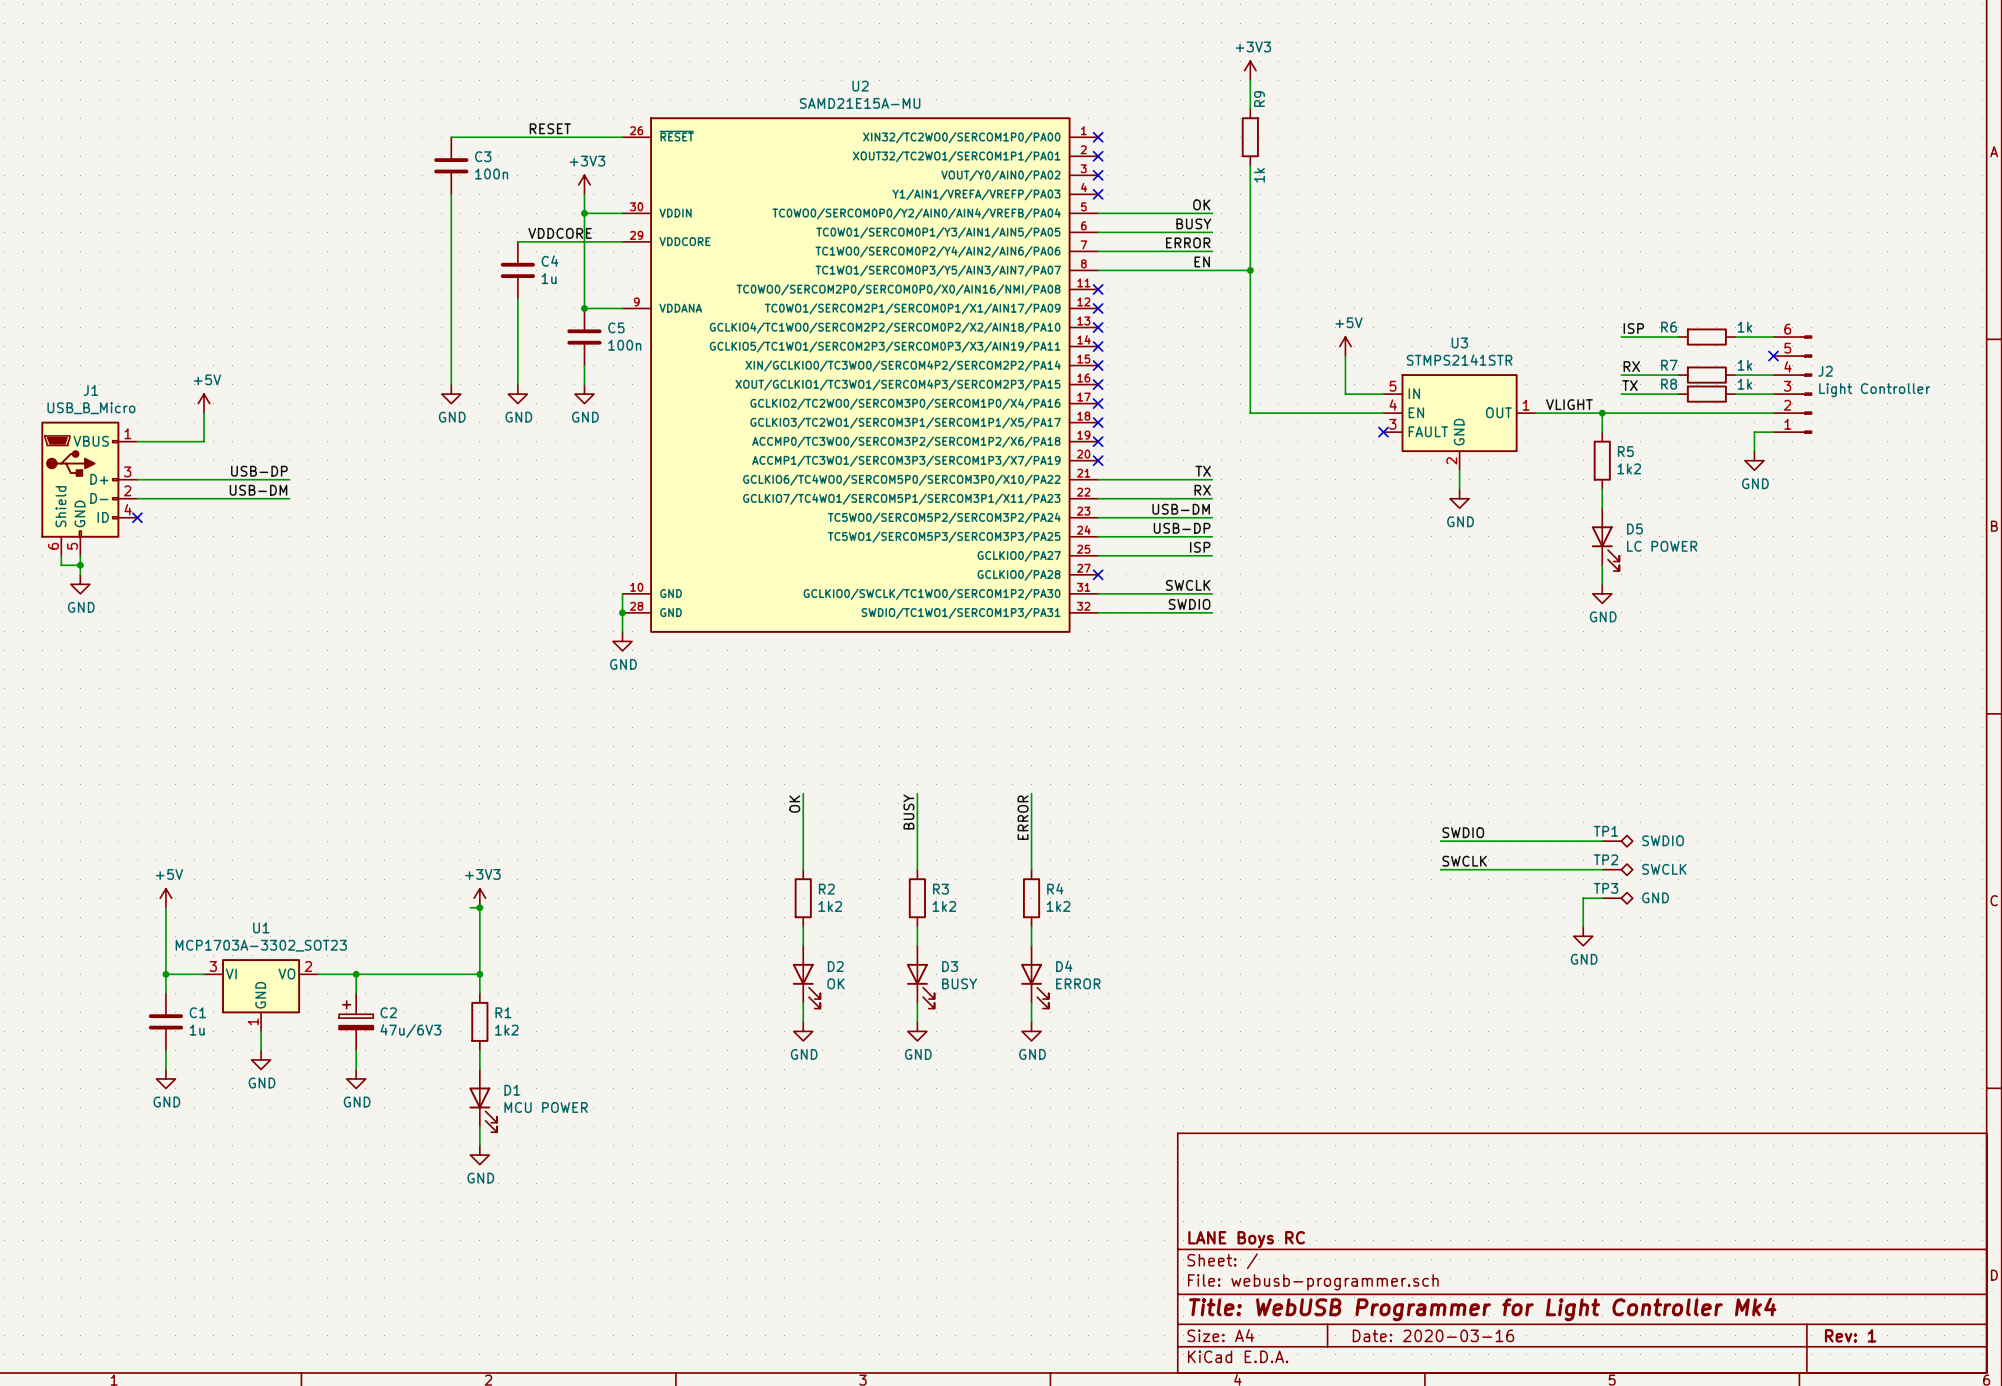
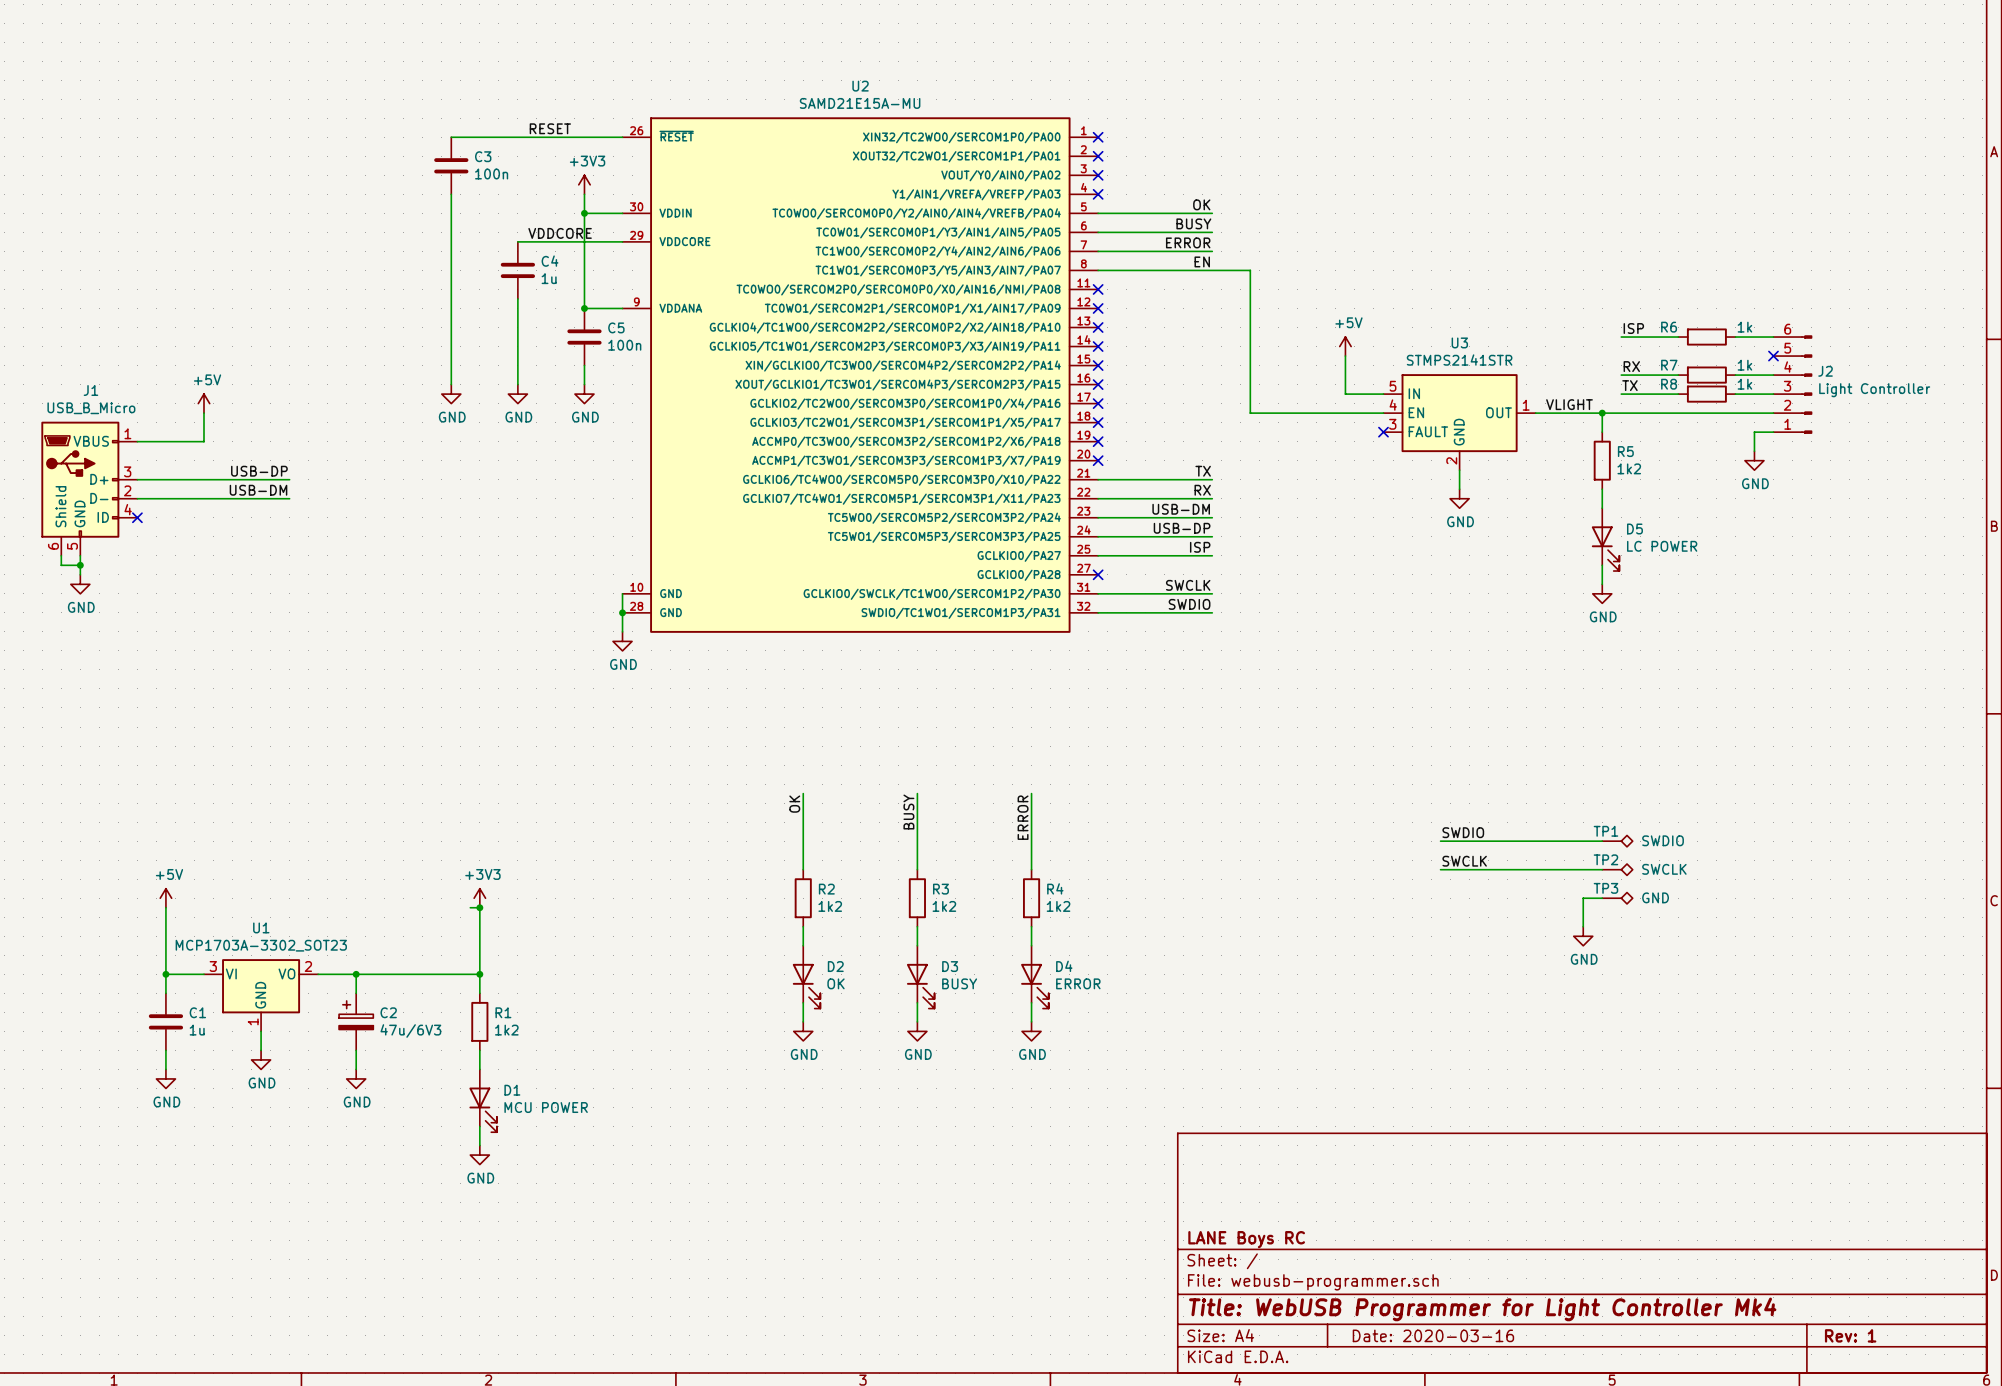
power symbol: +3V3 (1250, 70) -> none
wire: (1250, 80) (1250, 108) -> none
R9: 1k (1250, 137) -> none
wire: (1250, 165) (1250, 270) -> none
junction: (1250, 270) -> none

